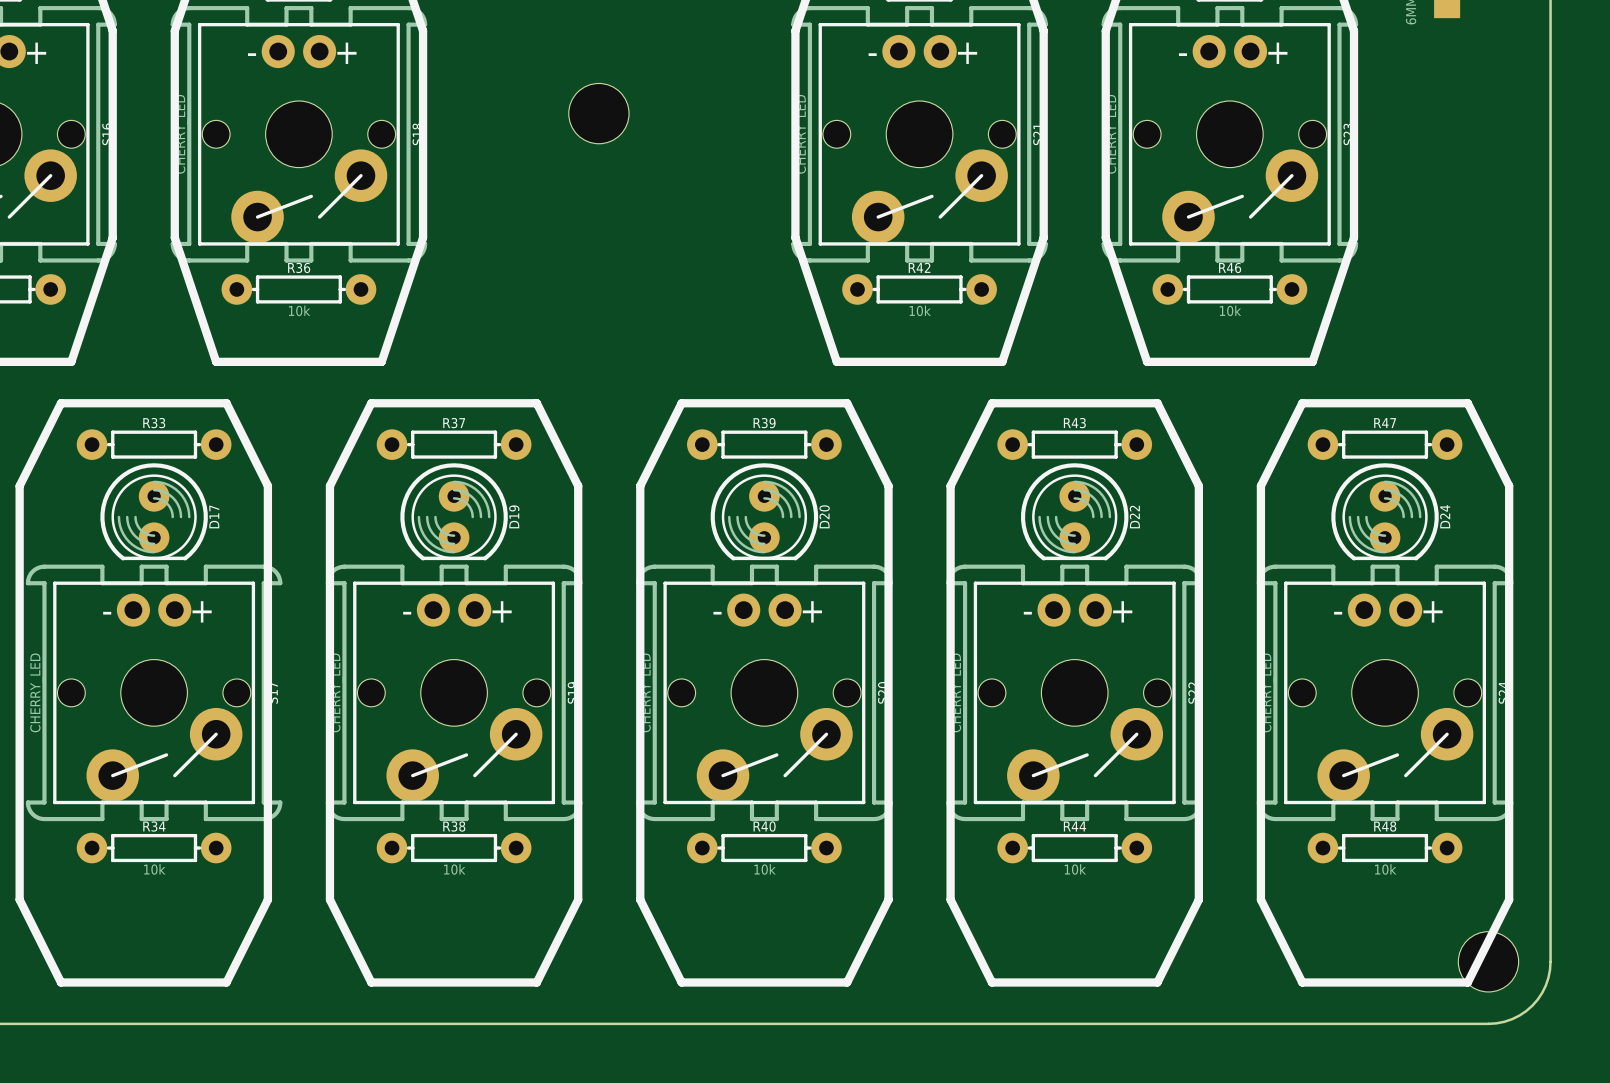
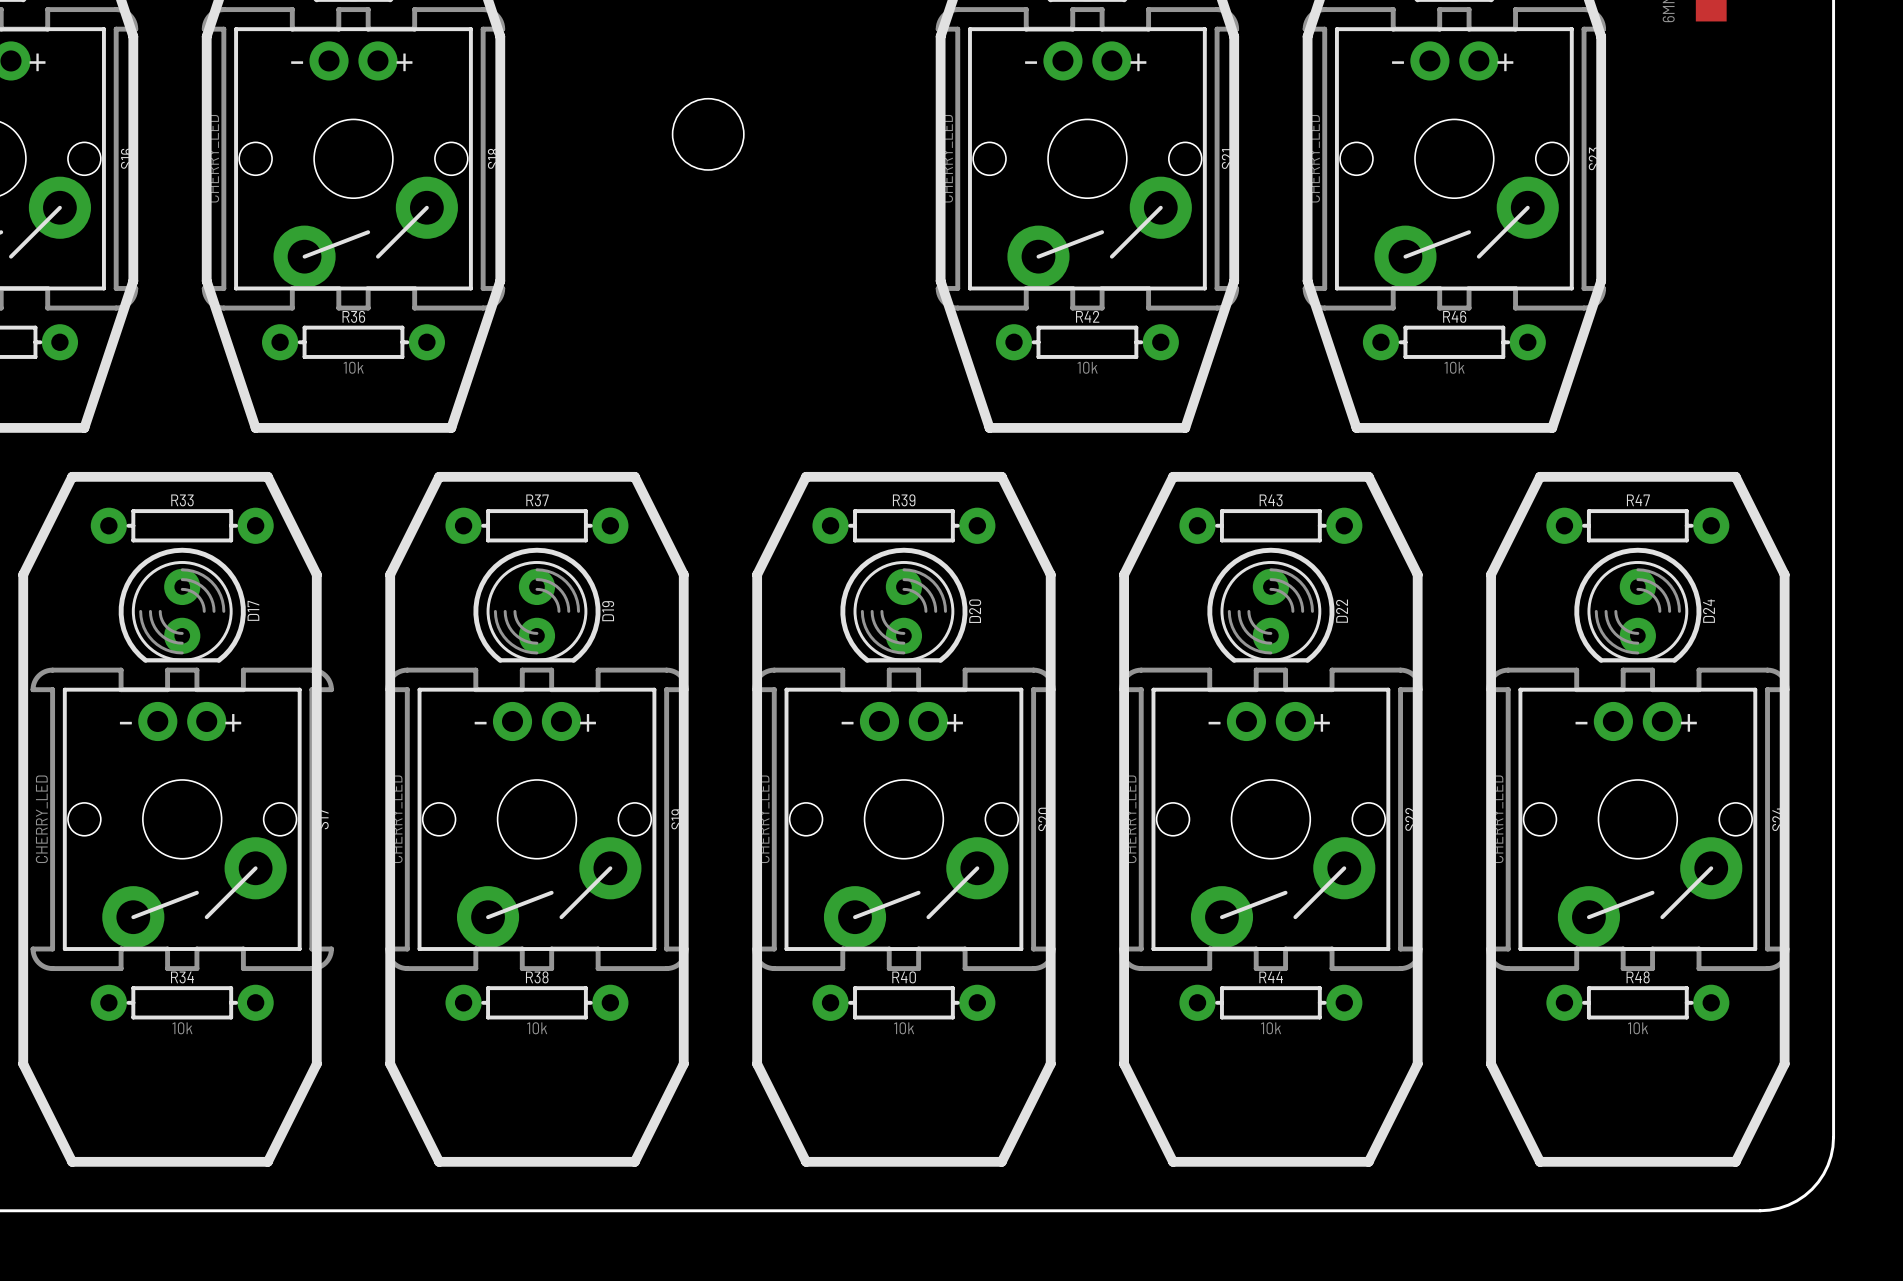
hole: (1488, 961) -> none

